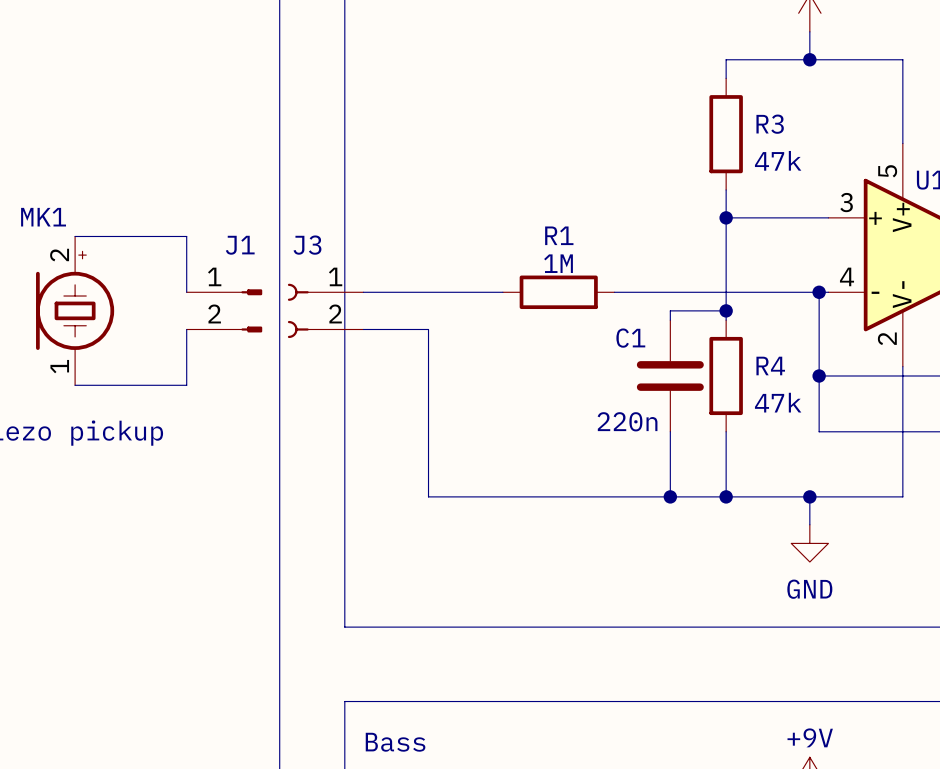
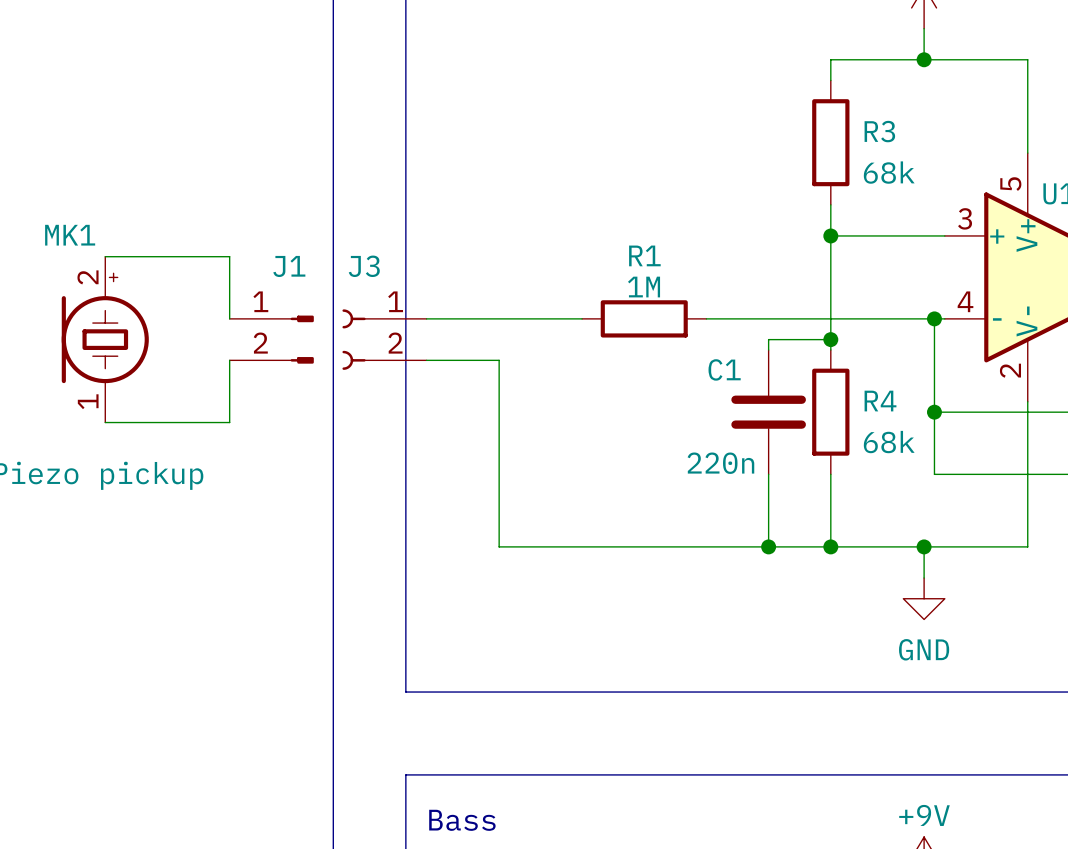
R3 value: 47k (778, 160) -> 68k (889, 172)
R4 value: 47k (778, 402) -> 68k (889, 442)

